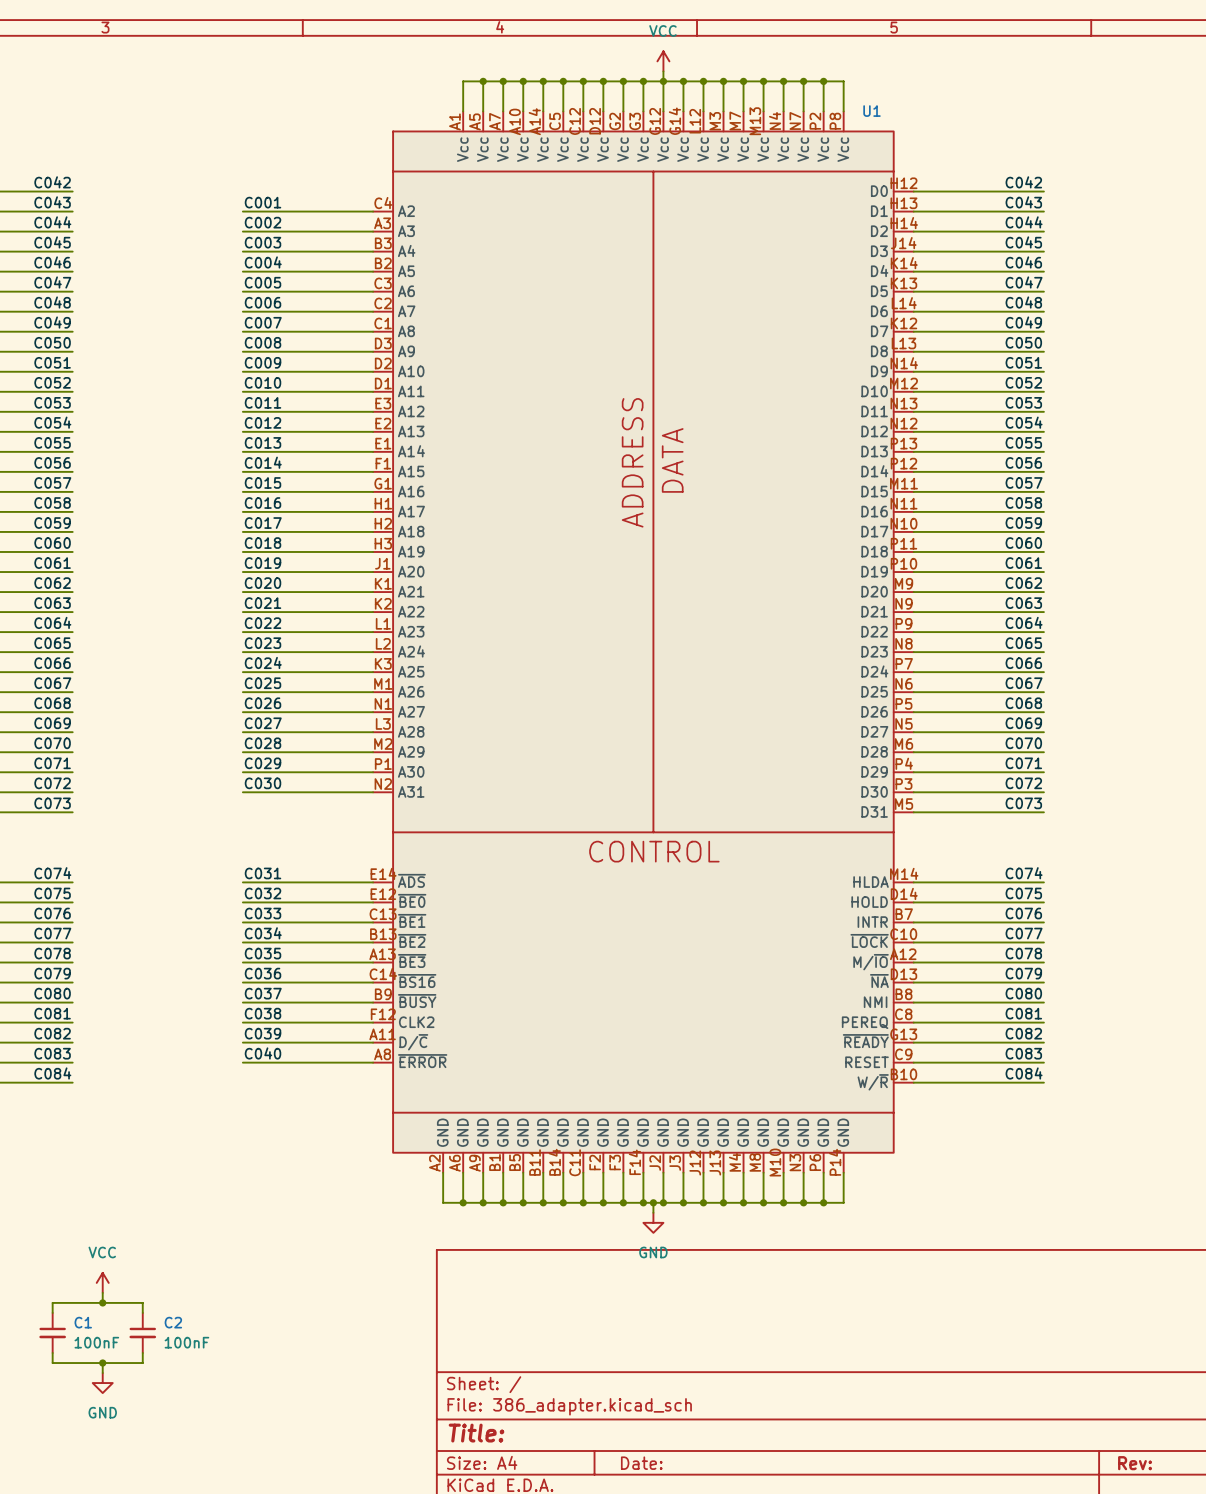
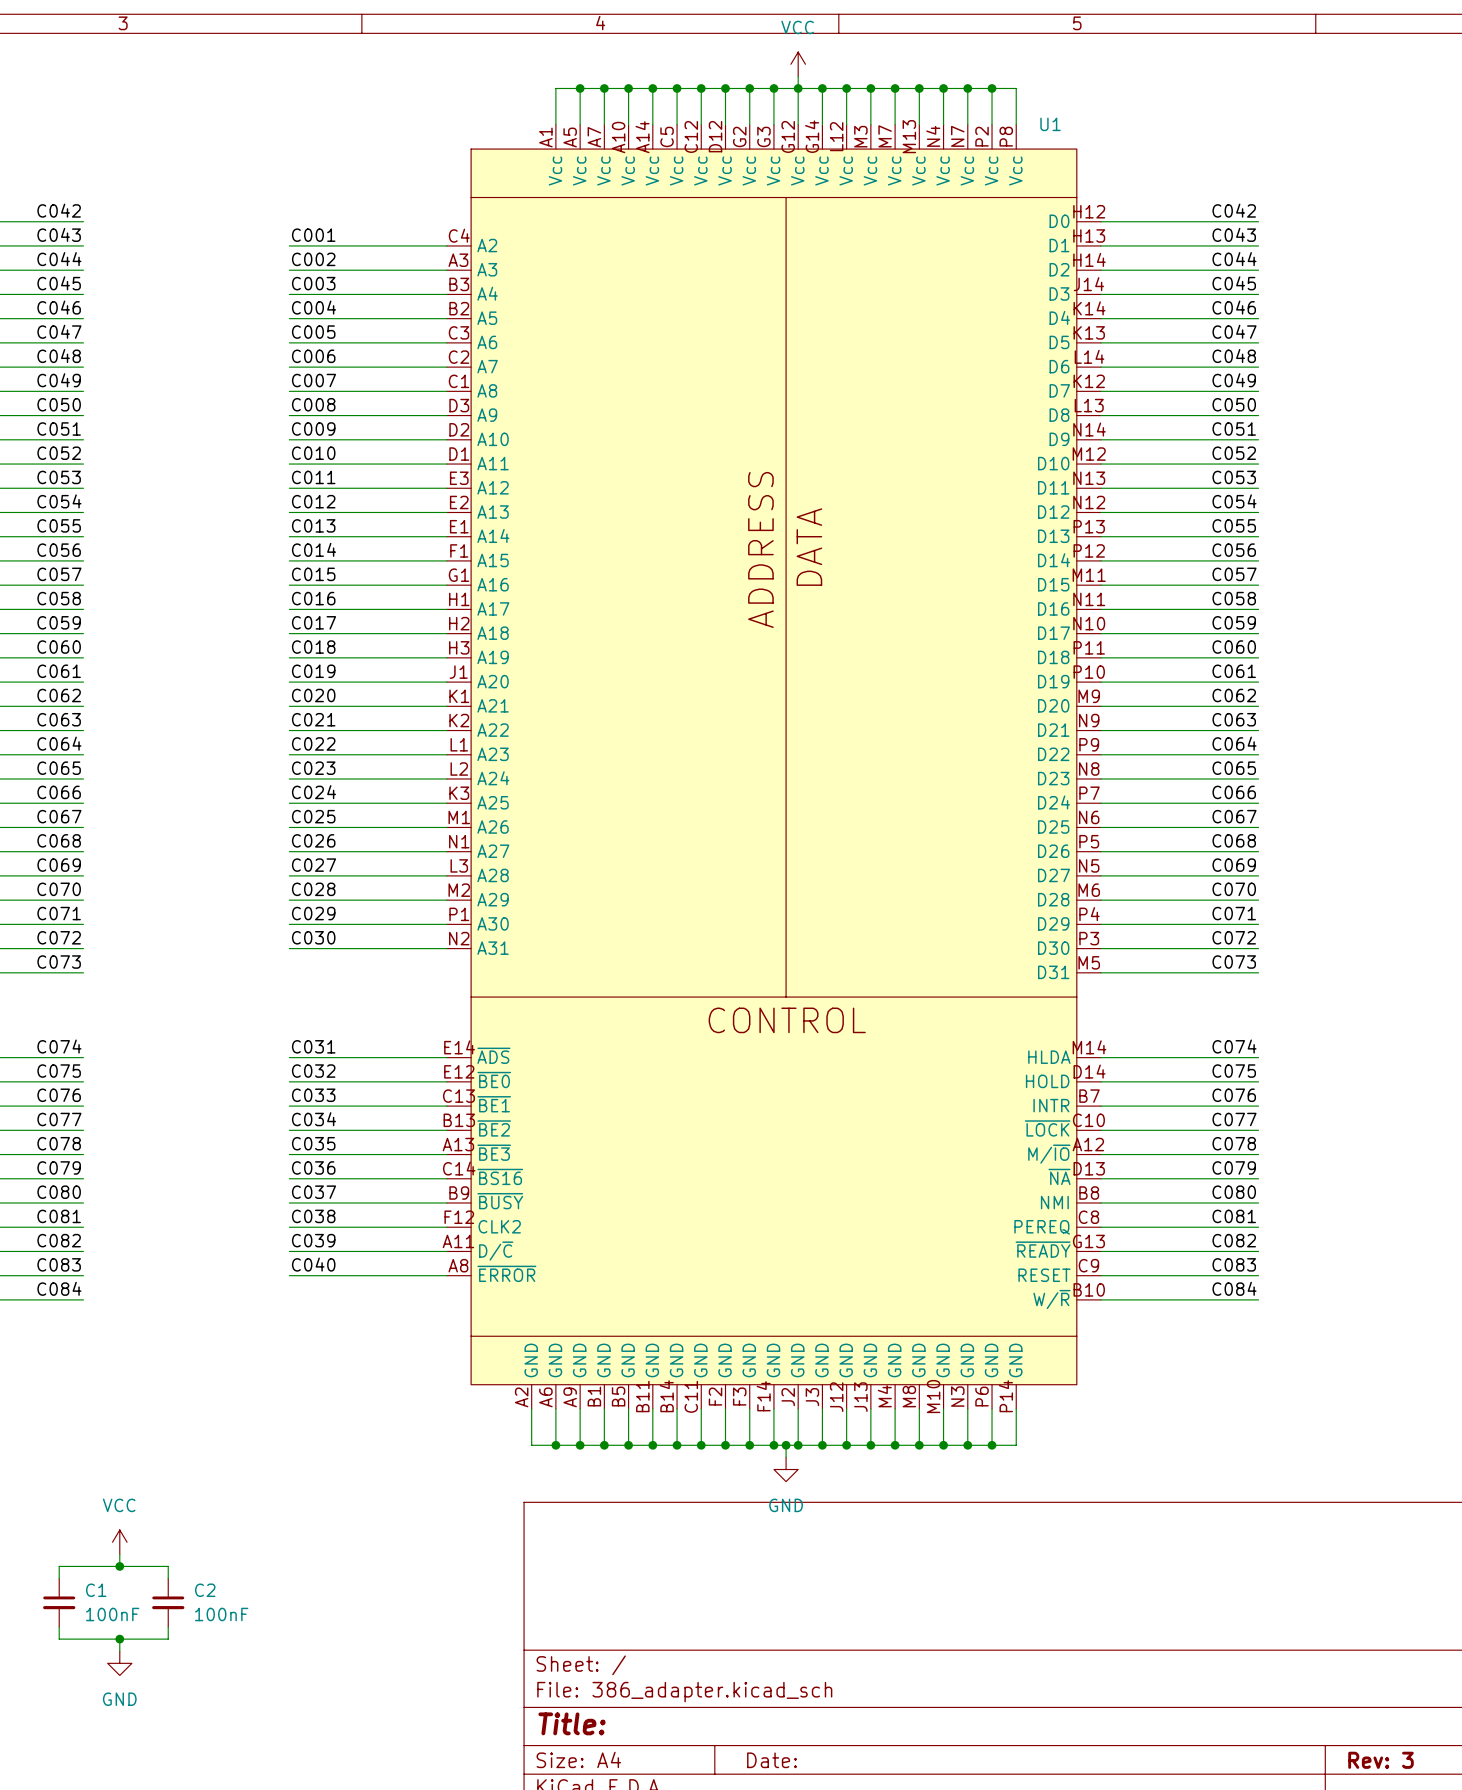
title block: Rev: (1135, 1463) -> Rev: 3 (1381, 1760)

